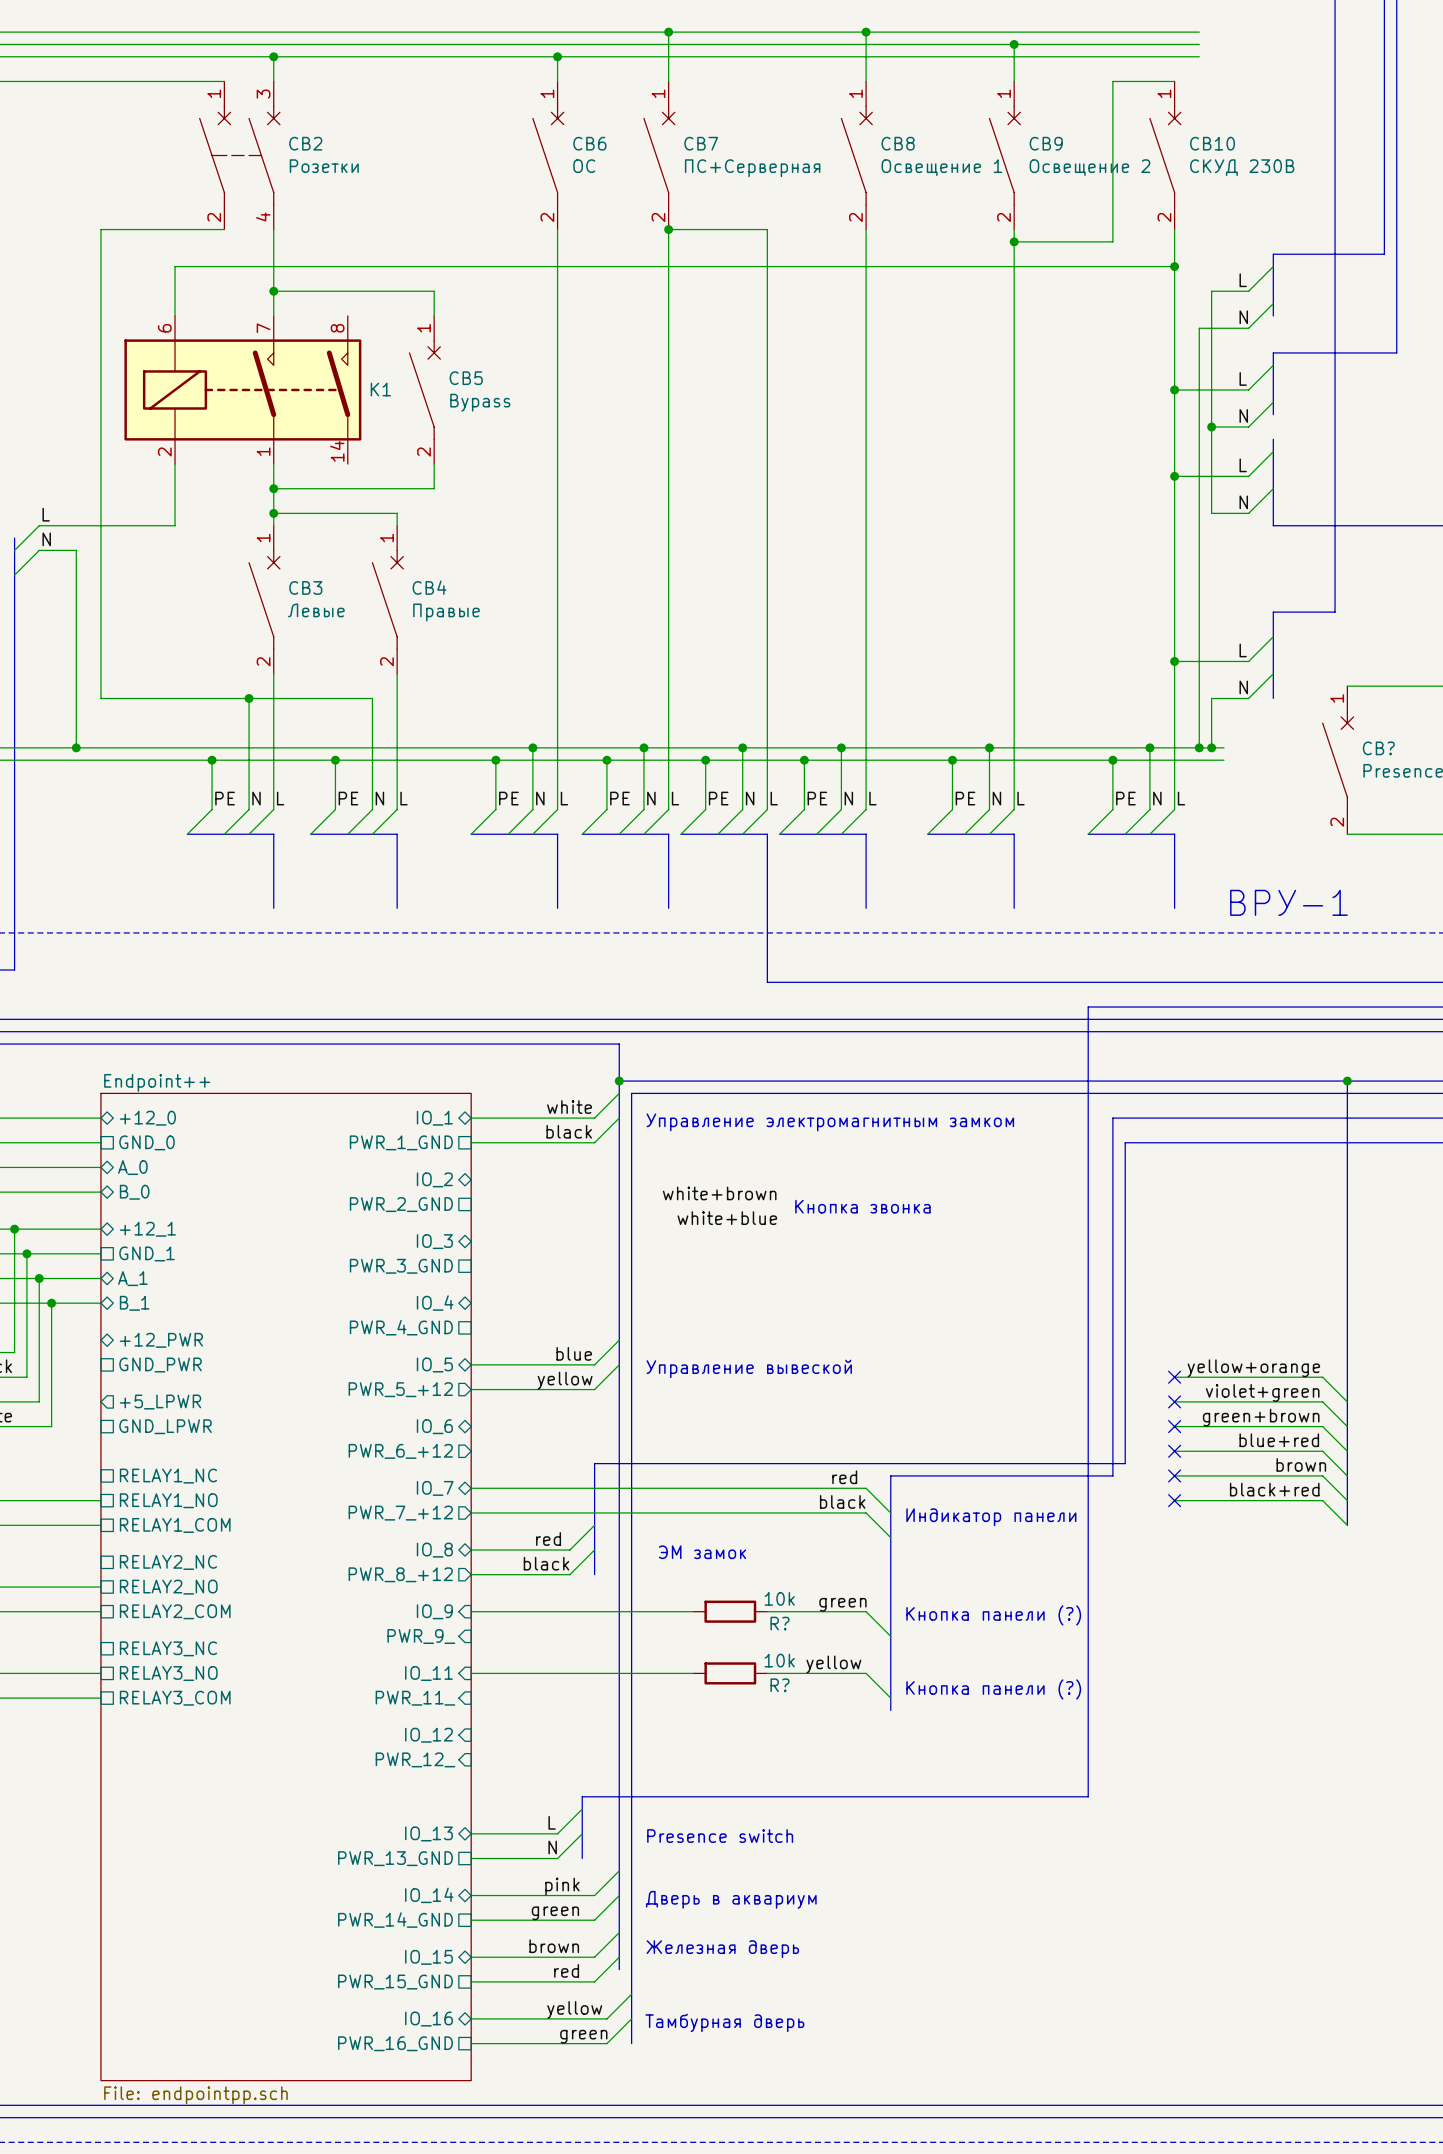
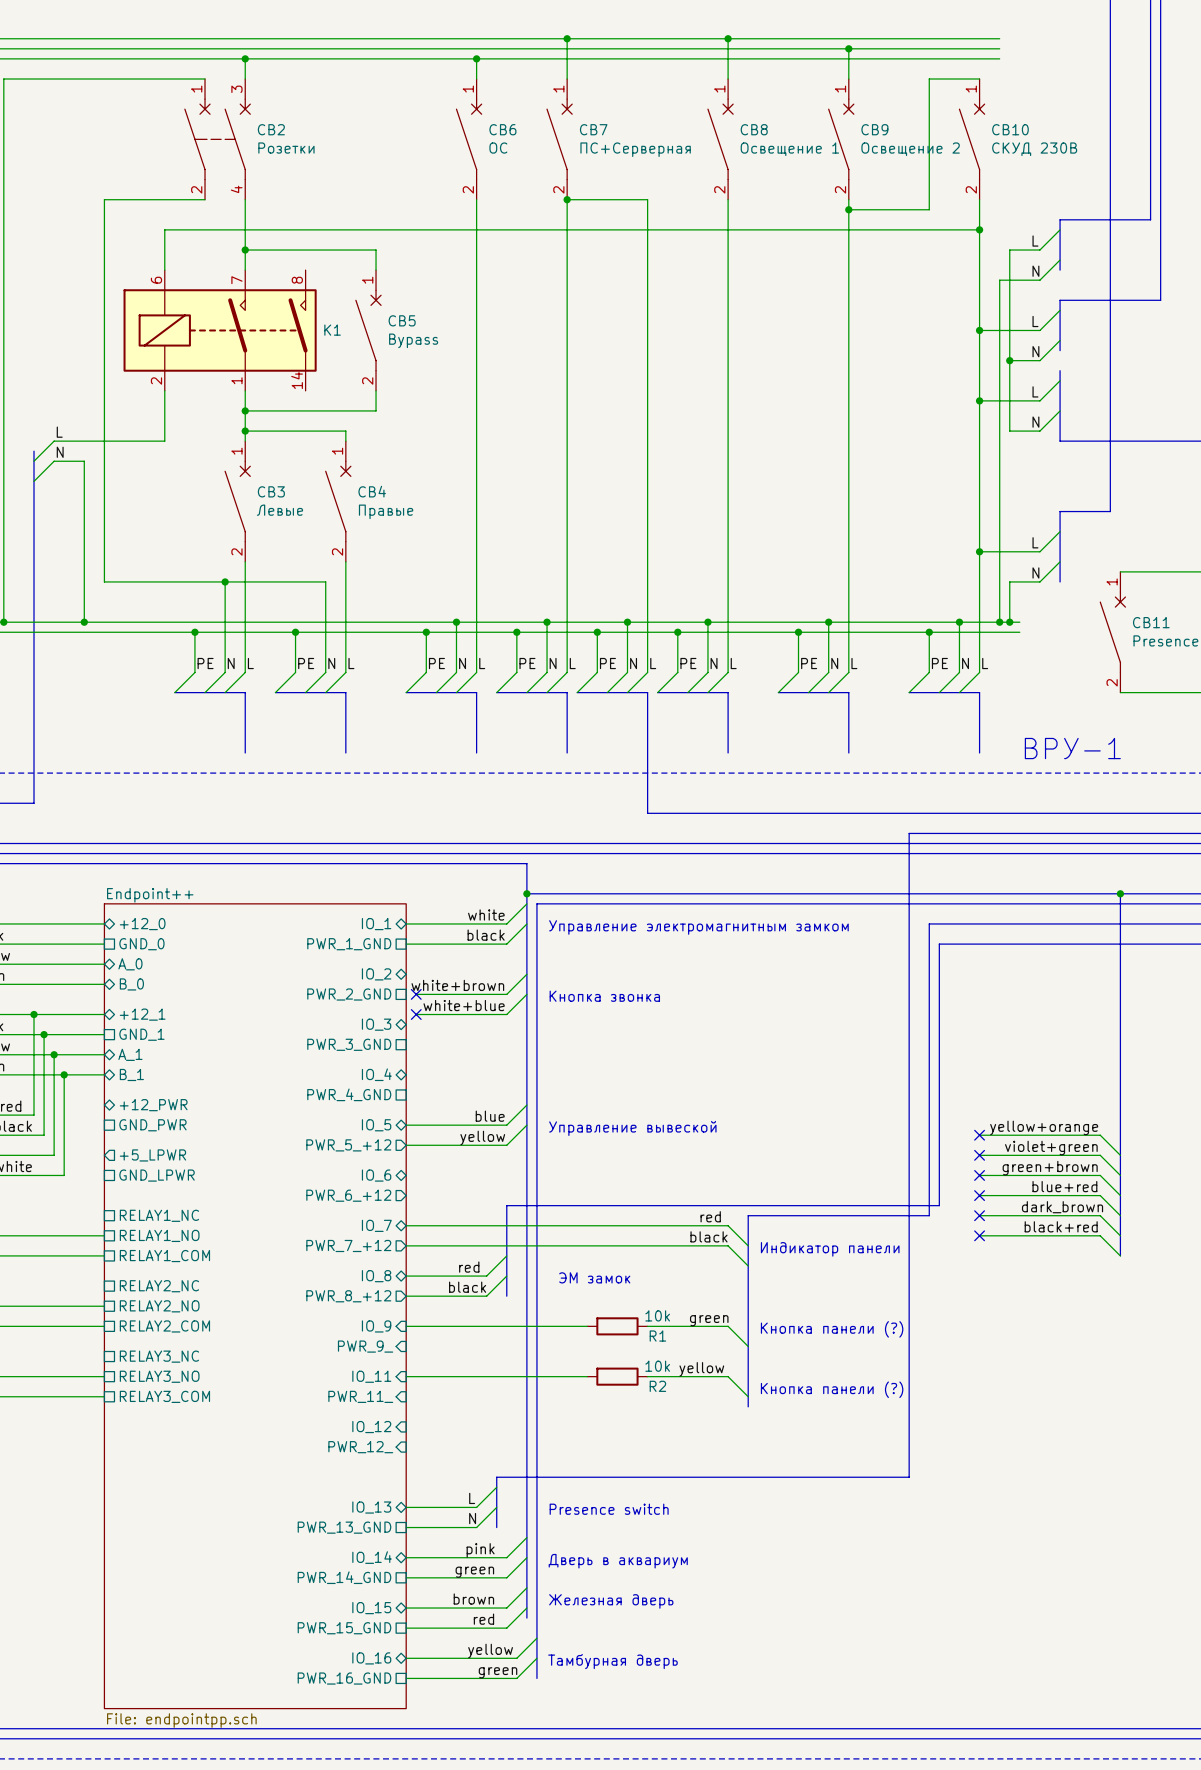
CB? name: CB? (1378, 748) -> CB11 (1151, 622)
wire: none -> (526, 974) (506, 994) (416, 994)
label position: white+brown (719, 1193) -> white+brown (457, 985)
no-connect mark: none -> (416, 994)
wire: none -> (526, 994) (506, 1014) (416, 1014)
text position: Кнопка звонка (862, 1206) -> Кнопка звонка (604, 996)
label position: white+blue (727, 1218) -> white+blue (464, 1005)
no-connect mark: none -> (416, 1014)
label: brown (1301, 1464) -> dark_brown (1062, 1207)
R? name: R? (780, 1623) -> R1 (657, 1336)
R? name: R? (780, 1685) -> R2 (657, 1386)

